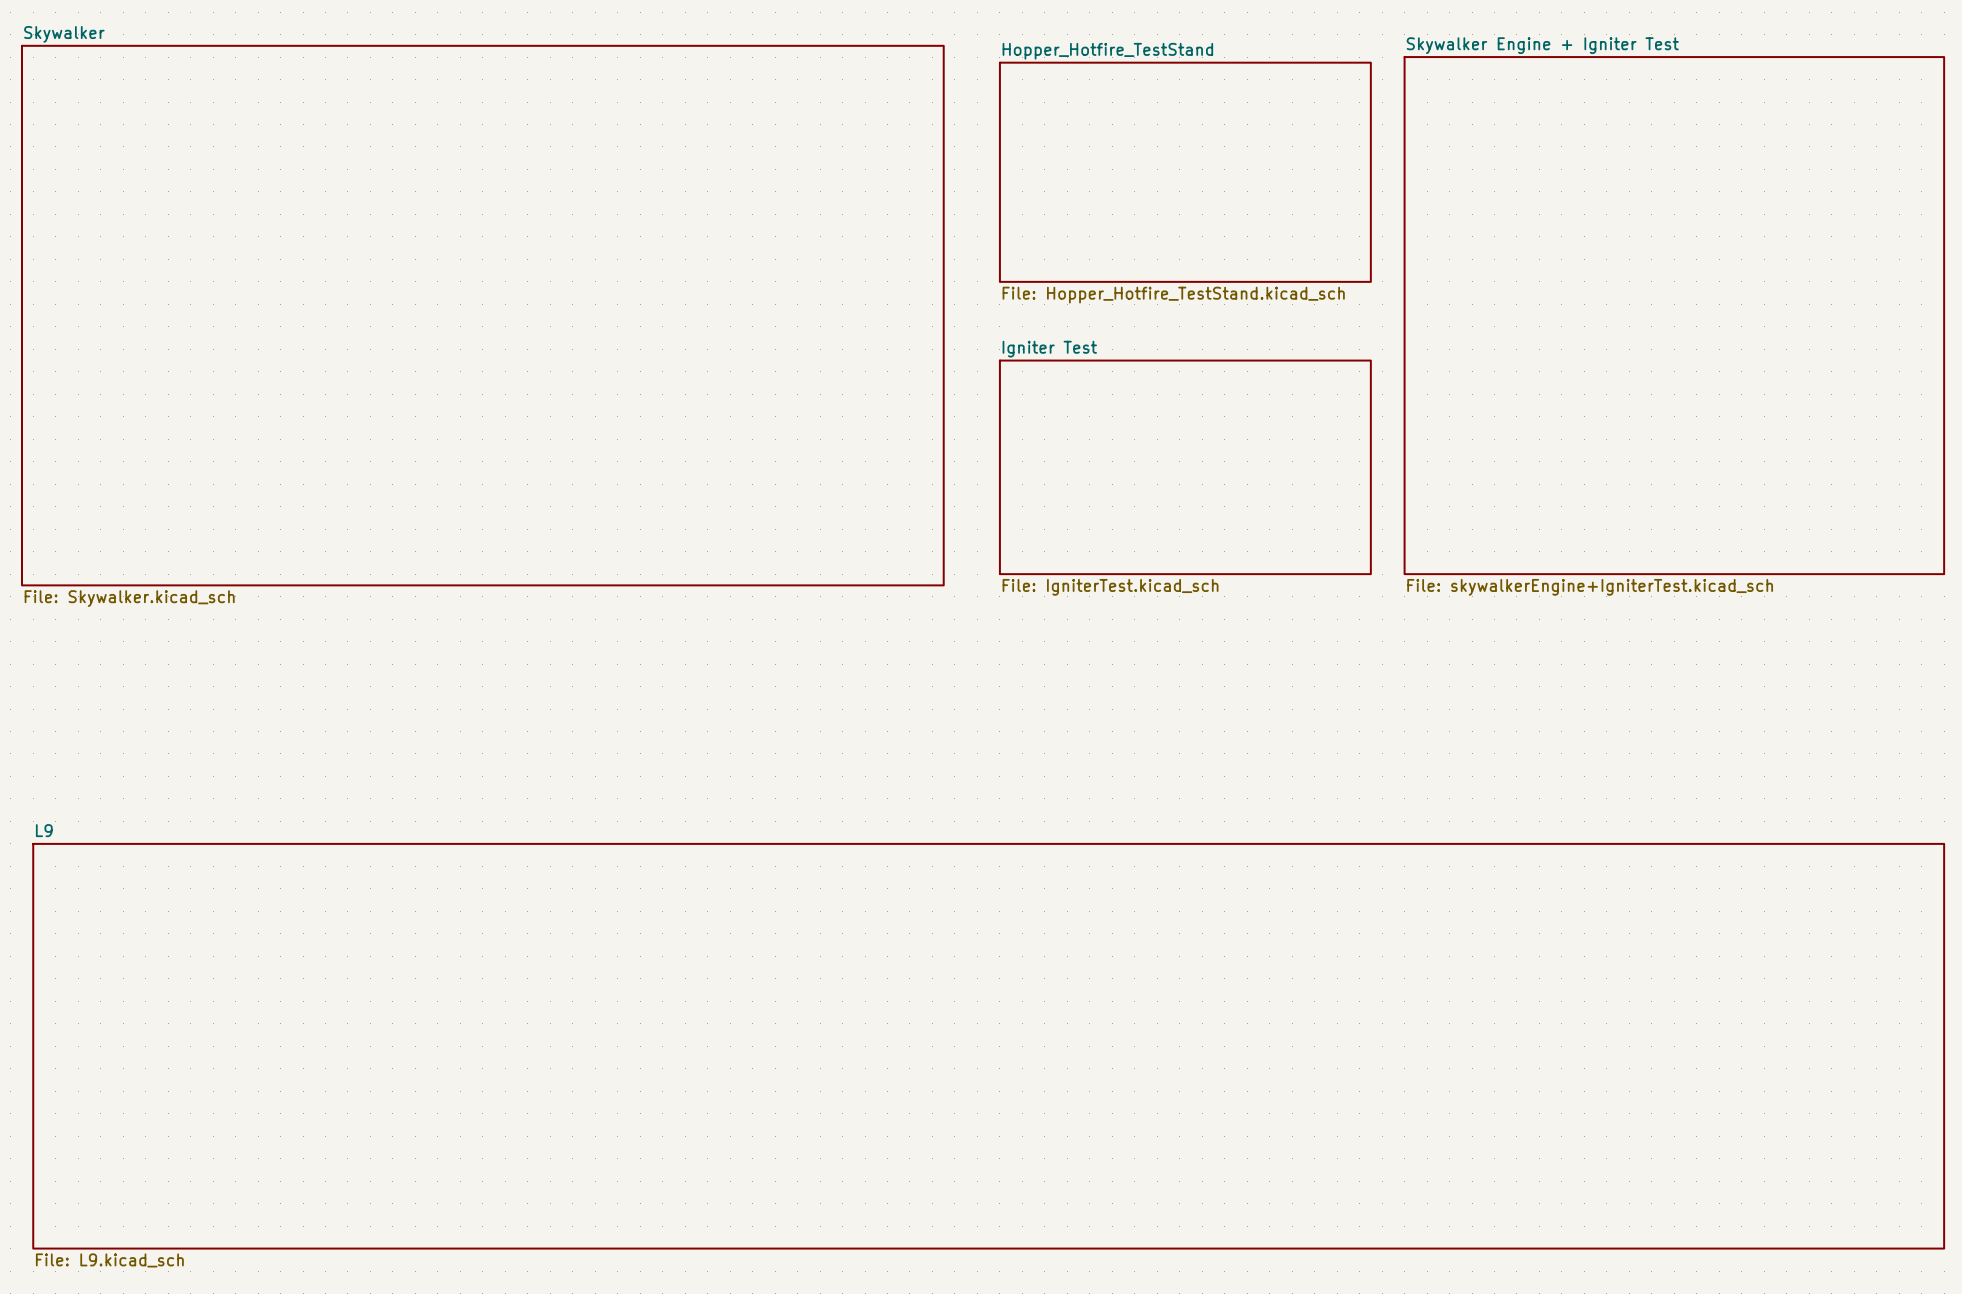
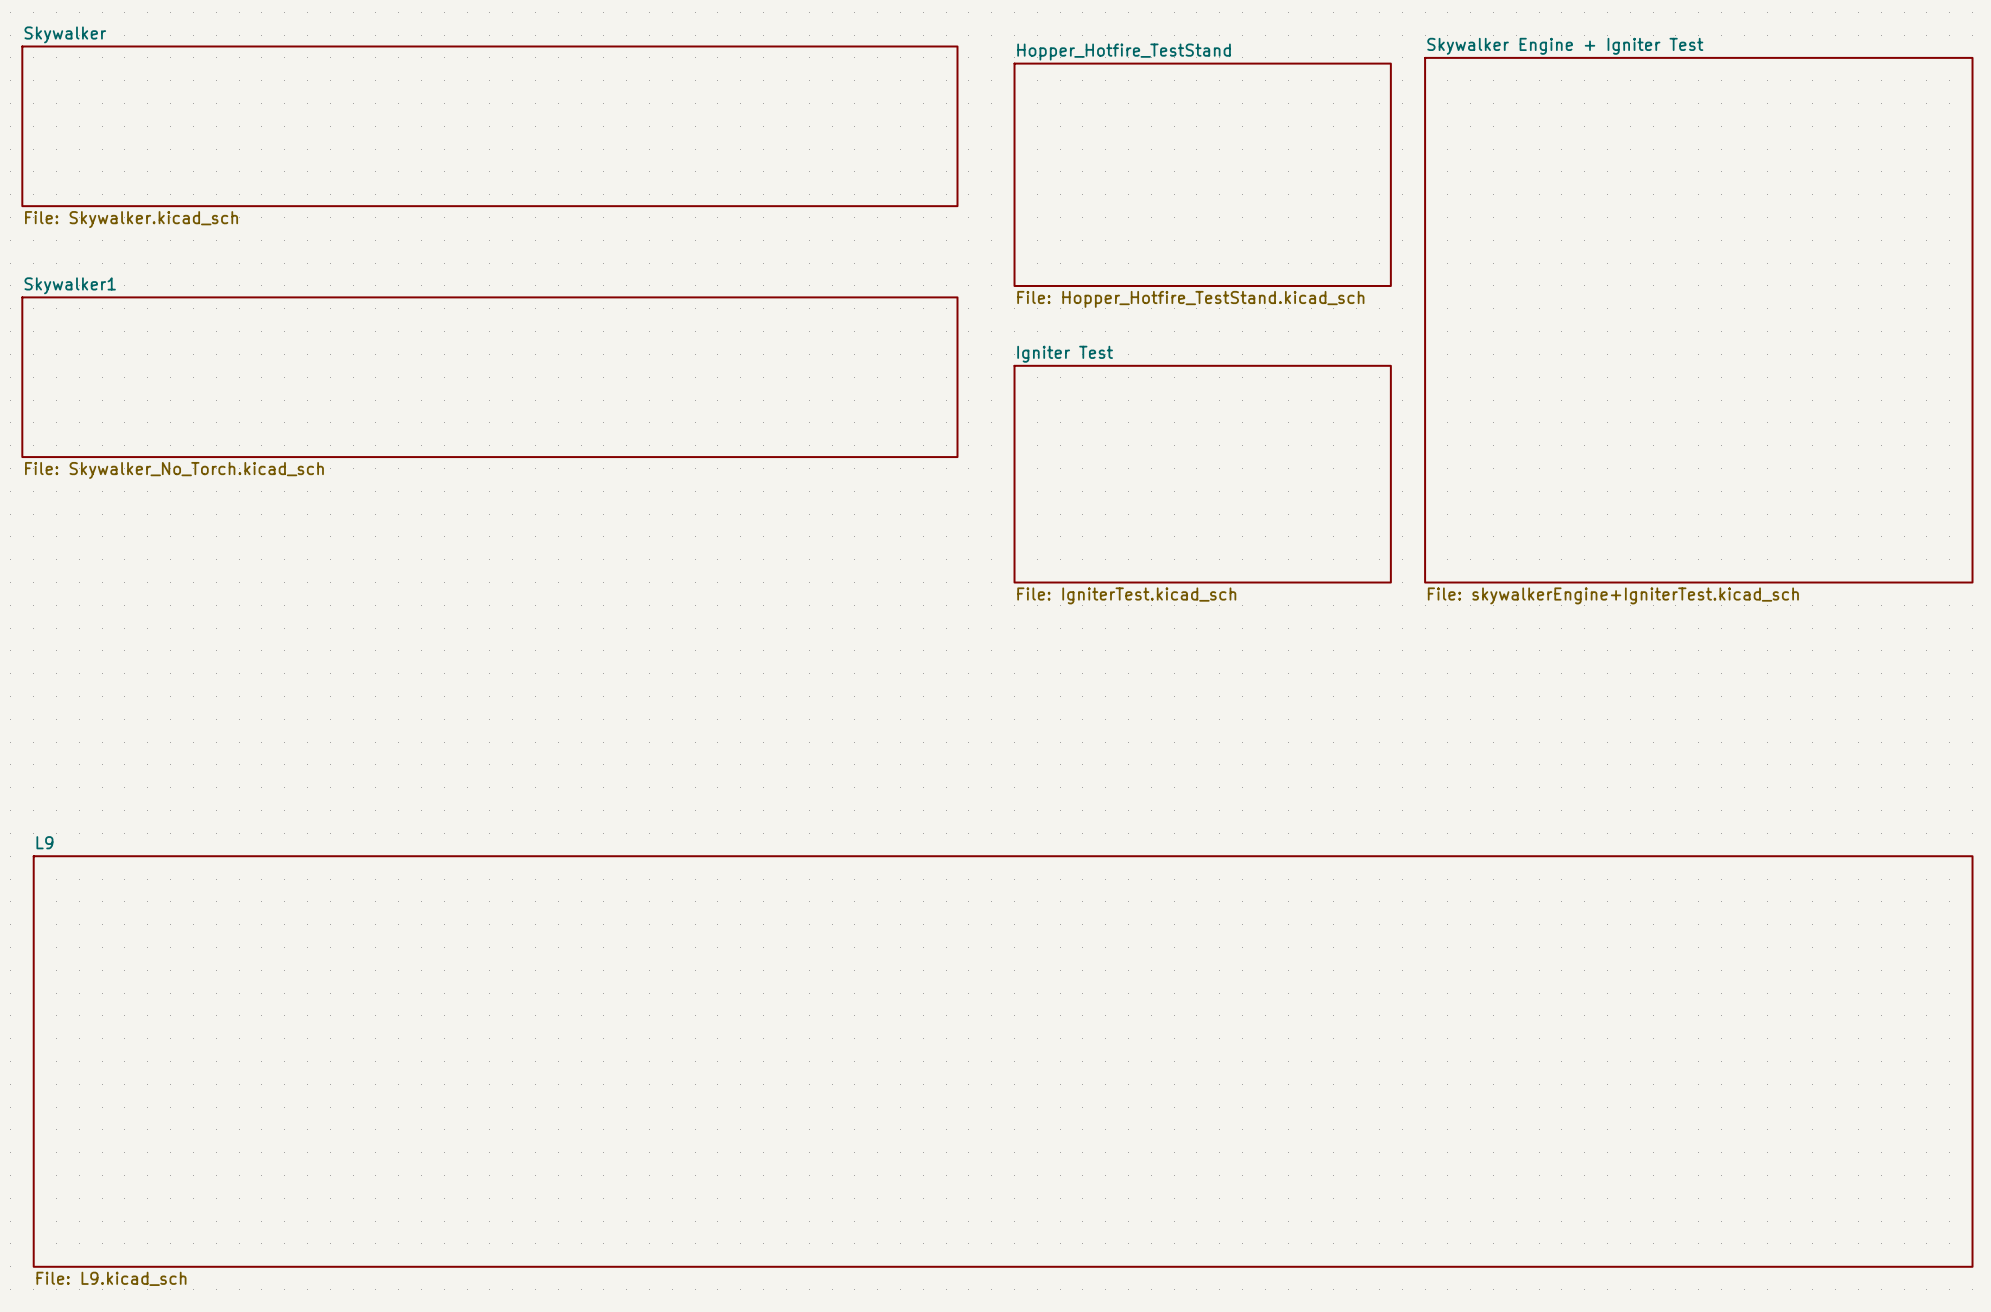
sheet Skywalker: none -> File: Skywalker.kicad_sch (489, 126)
sheet Skywalker: File: Skywalker.kicad_sch (482, 315) -> none
sheet Skywalker1: none -> File: Skywalker_No_Torch.kicad_sch (489, 377)

